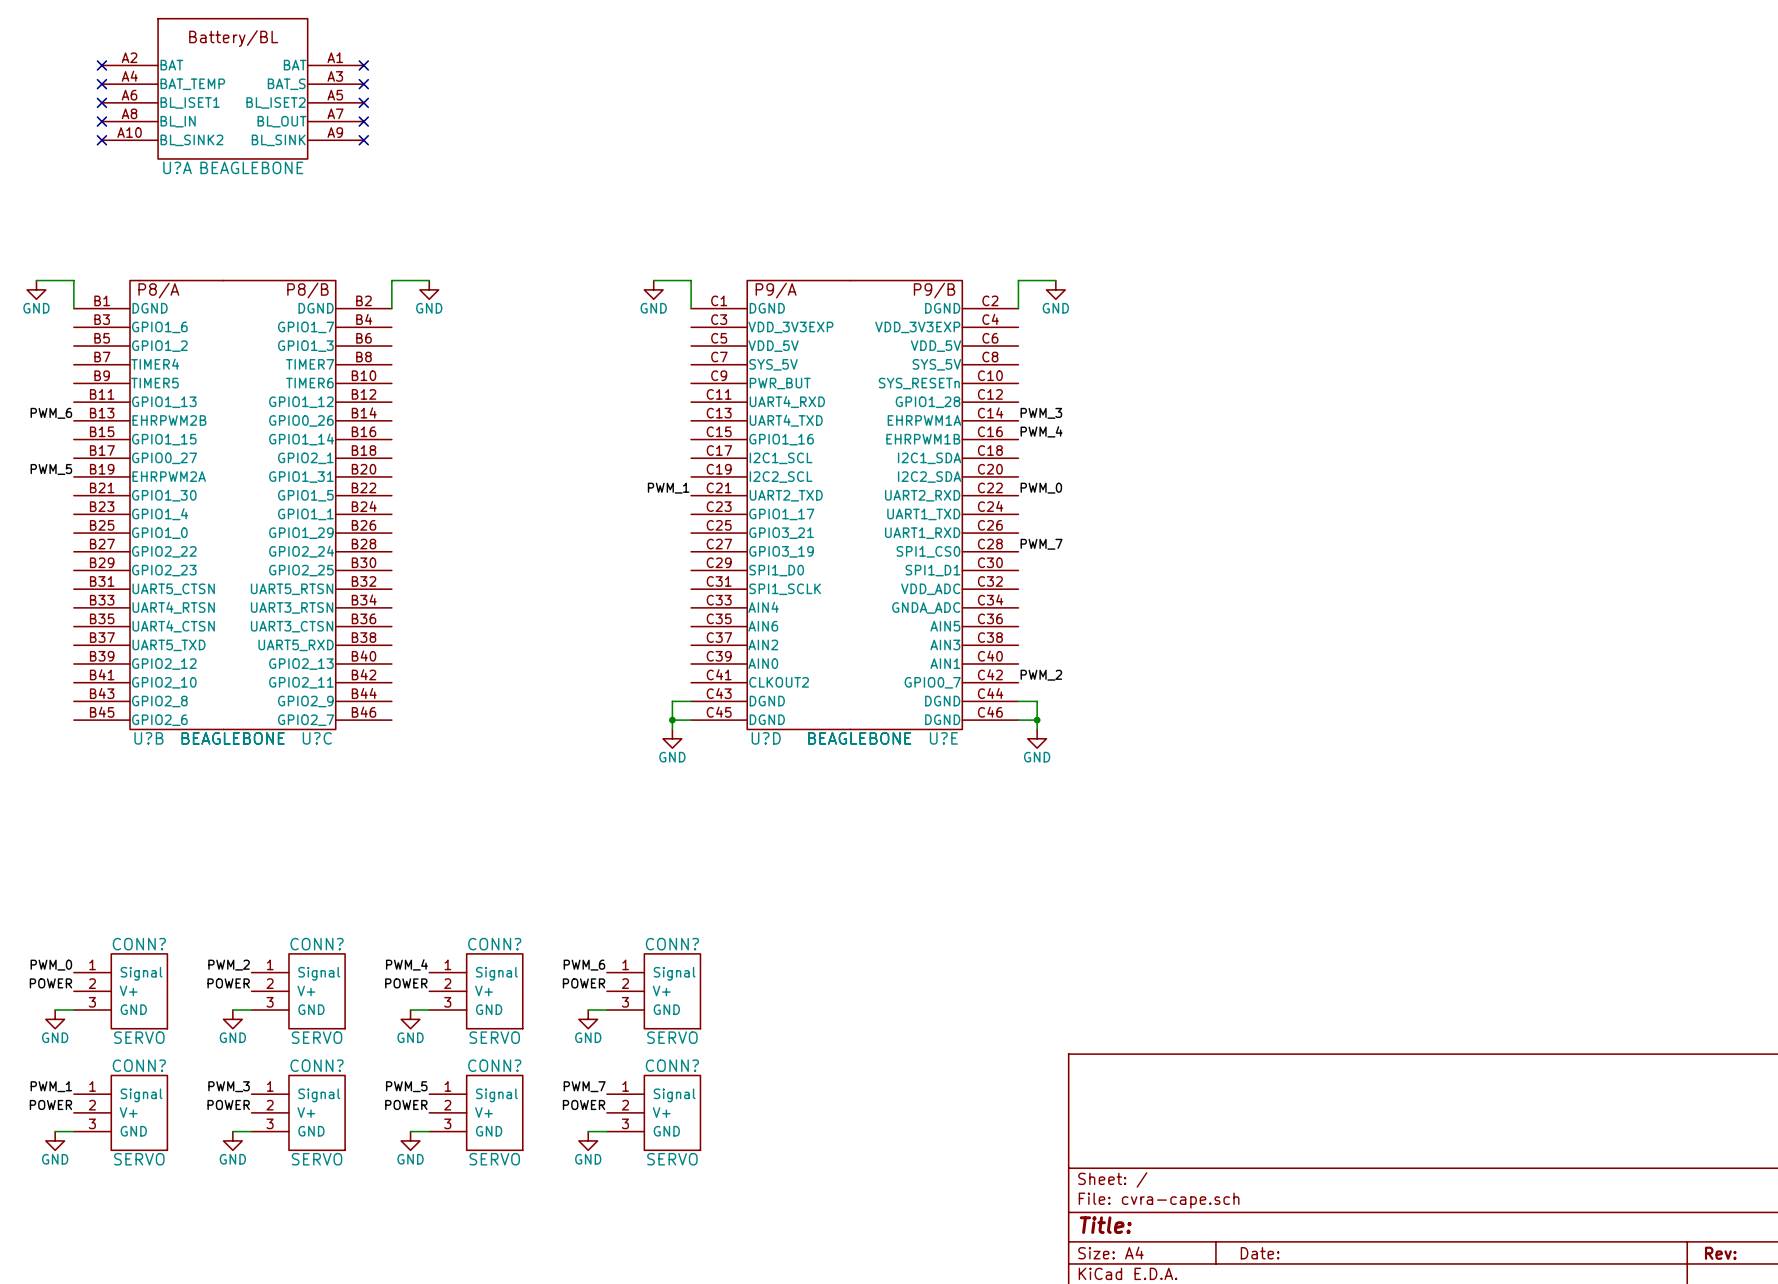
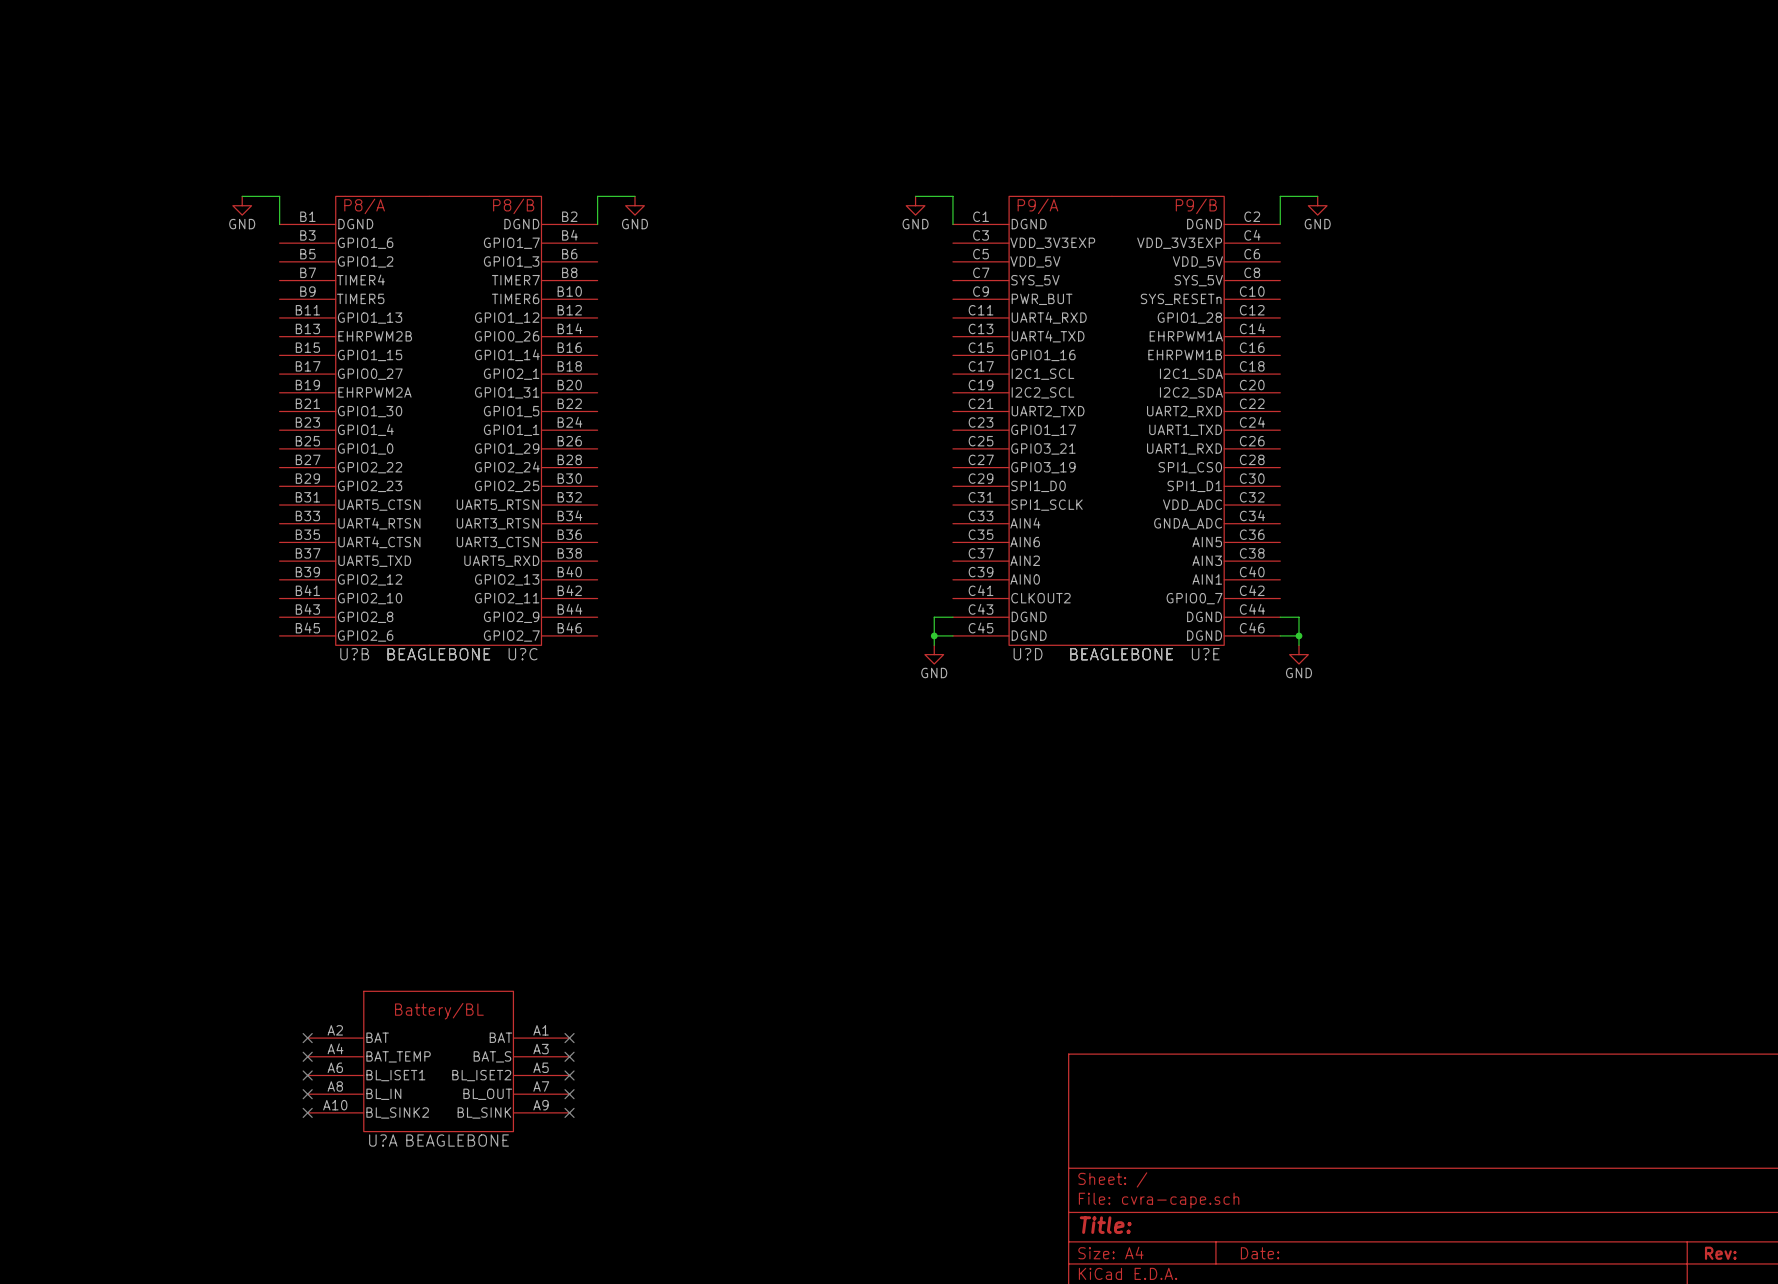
no-connect mark: (101, 65) -> none
no-connect mark: (363, 65) -> none
no-connect mark: (101, 84) -> none
no-connect mark: (363, 84) -> none
U?A: BEAGLEBONE (232, 88) -> none
no-connect mark: (101, 102) -> none
no-connect mark: (363, 102) -> none
no-connect mark: (101, 121) -> none
no-connect mark: (363, 121) -> none
no-connect mark: (101, 140) -> none
no-connect mark: (363, 140) -> none
wire: none -> (242, 196) (279, 196) (279, 224)
wire: none -> (635, 196) (597, 196) (597, 224)
wire: none -> (915, 196) (952, 196) (952, 224)
wire: none -> (1317, 196) (1280, 196) (1280, 224)
power symbol: none -> GND (242, 205)
power symbol: none -> GND (915, 205)
power symbol: none -> GND (1317, 205)
wire: (36, 280) (73, 280) (73, 308) -> none
wire: (429, 280) (391, 280) (391, 308) -> none
wire: (653, 280) (691, 280) (691, 308) -> none
wire: (1055, 280) (1018, 280) (1018, 308) -> none
power symbol: GND (36, 289) -> none
power symbol: GND (429, 289) -> none
power symbol position: GND (653, 289) -> GND (635, 205)
power symbol: GND (1055, 289) -> none
label: PWM_6 (51, 413) -> none
label: PWM_3 (1041, 413) -> none
U?B: none -> BEAGLEBONE (354, 420)
U?C: none -> BEAGLEBONE (513, 420)
U?D: none -> BEAGLEBONE (1032, 420)
U?E: none -> BEAGLEBONE (1196, 420)
label: PWM_4 (1041, 431) -> none
label: PWM_5 (51, 469) -> none
label: PWM_1 (668, 488) -> none
label: PWM_0 (1041, 488) -> none
U?B: BEAGLEBONE (148, 505) -> none
U?C: BEAGLEBONE (307, 505) -> none
U?D: BEAGLEBONE (770, 505) -> none
U?E: BEAGLEBONE (934, 505) -> none
label: PWM_7 (1041, 544) -> none
wire: none -> (952, 617) (934, 617) (934, 645)
wire: none -> (1280, 617) (1299, 617) (1299, 645)
junction: none -> (934, 635)
wire: none -> (1280, 635) (1299, 635)
junction: none -> (1299, 635)
power symbol: none -> GND (1299, 654)
label: PWM_2 (1041, 675) -> none
wire: (691, 701) (672, 701) (672, 729) -> none
wire: (1018, 701) (1037, 701) (1037, 729) -> none
wire: (672, 720) (691, 720) -> none
junction: (672, 720) -> none
wire: (1018, 720) (1037, 720) -> (934, 635) (952, 635)
junction: (1037, 720) -> none
power symbol: GND (672, 738) -> none
power symbol position: GND (1037, 738) -> GND (934, 654)
label: PWM_4 (406, 964) -> none
label: PWM_0 (51, 965) -> none
label: PWM_2 (229, 965) -> none
label: PWM_6 (584, 965) -> none
label: POWER (50, 983) -> none
label: POWER (228, 983) -> none
label: POWER (406, 983) -> none
label: POWER (584, 983) -> none
CONN?: SERVO (120, 991) -> none
CONN?: SERVO (298, 991) -> none
CONN?: SERVO (476, 991) -> none
CONN?: SERVO (653, 991) -> none
wire: (55, 1010) (73, 1010) -> none
wire: (232, 1010) (251, 1010) -> none
wire: (410, 1010) (429, 1010) -> none
wire: (588, 1010) (606, 1010) -> none
power symbol: GND (55, 1019) -> none
power symbol: GND (232, 1019) -> none
power symbol: GND (410, 1019) -> none
power symbol: GND (588, 1019) -> none
no-connect mark: none -> (307, 1038)
no-connect mark: none -> (569, 1038)
no-connect mark: none -> (307, 1056)
no-connect mark: none -> (569, 1056)
U?A: none -> BEAGLEBONE (438, 1061)
no-connect mark: none -> (307, 1075)
no-connect mark: none -> (569, 1075)
label: PWM_1 (51, 1086) -> none
label: PWM_3 (229, 1086) -> none
label: PWM_5 (406, 1086) -> none
label: PWM_7 (584, 1086) -> none
no-connect mark: none -> (307, 1094)
no-connect mark: none -> (569, 1094)
label: POWER (50, 1104) -> none
label: POWER (228, 1104) -> none
label: POWER (406, 1104) -> none
label: POWER (584, 1104) -> none
CONN?: SERVO (120, 1112) -> none
CONN?: SERVO (298, 1112) -> none
no-connect mark: none -> (307, 1112)
CONN?: SERVO (476, 1112) -> none
no-connect mark: none -> (569, 1112)
CONN?: SERVO (653, 1112) -> none
wire: (55, 1131) (73, 1131) -> none
wire: (232, 1131) (251, 1131) -> none
wire: (588, 1131) (606, 1131) -> none
power symbol: GND (55, 1140) -> none
power symbol: GND (232, 1140) -> none
power symbol: GND (410, 1140) -> none
power symbol: GND (588, 1140) -> none

